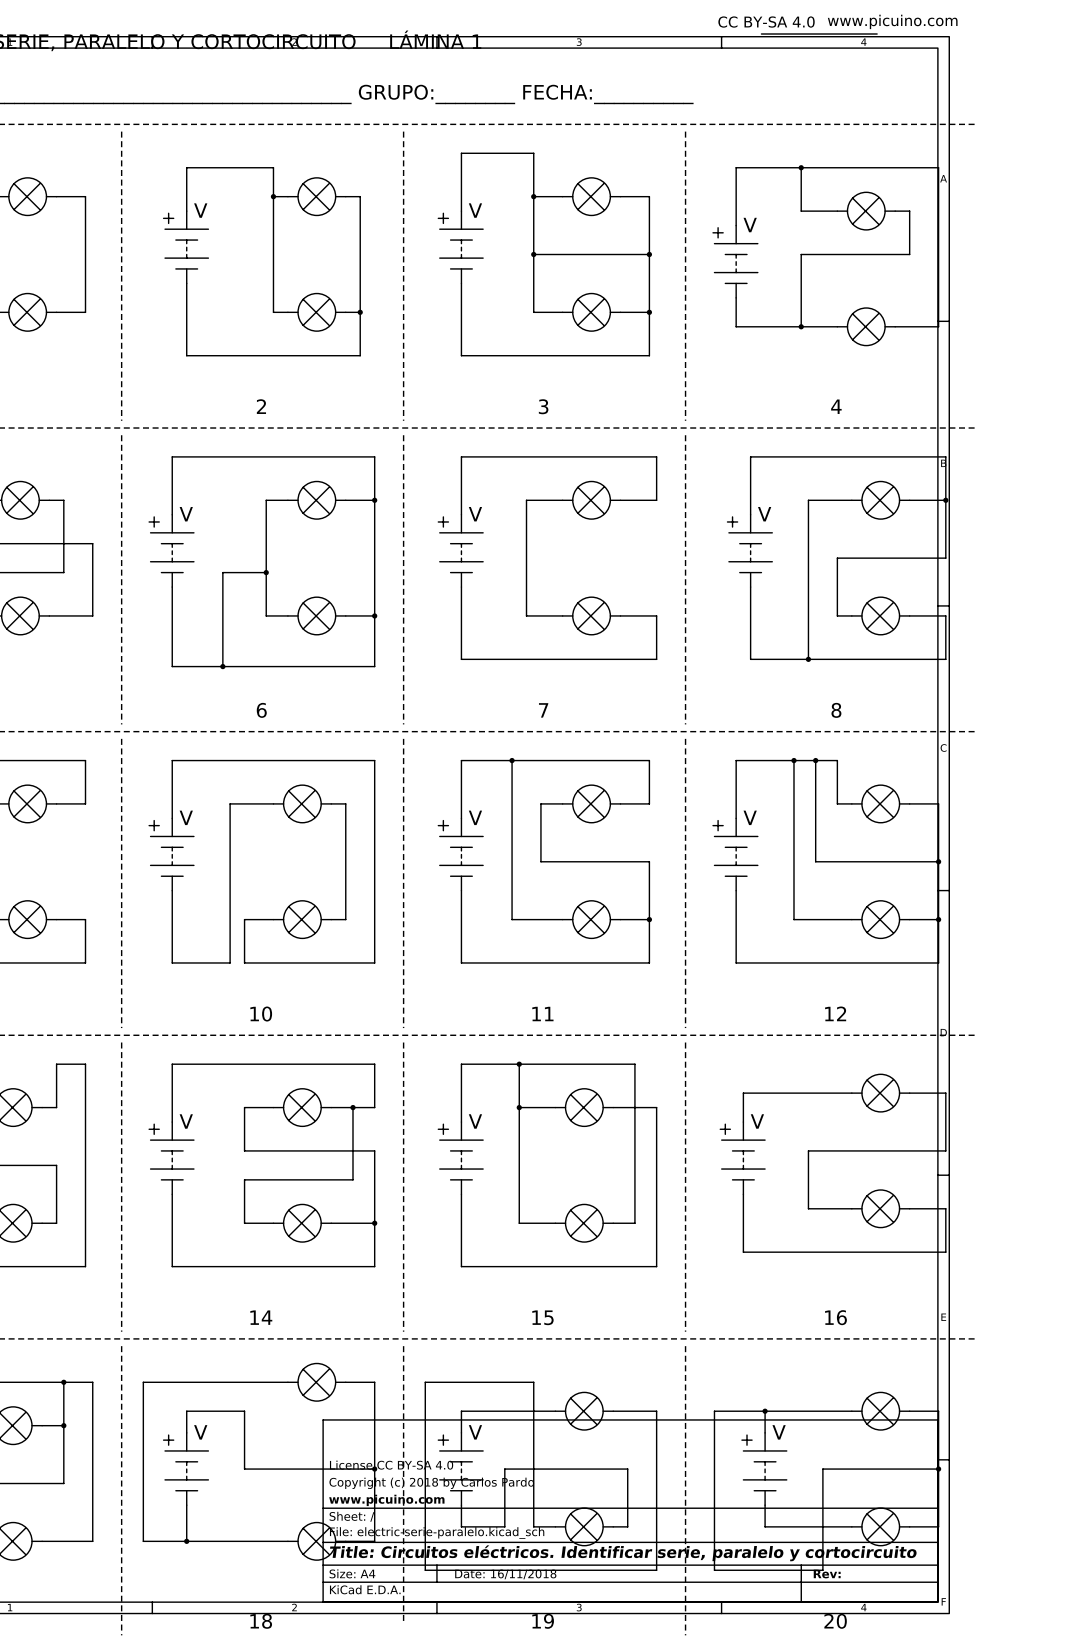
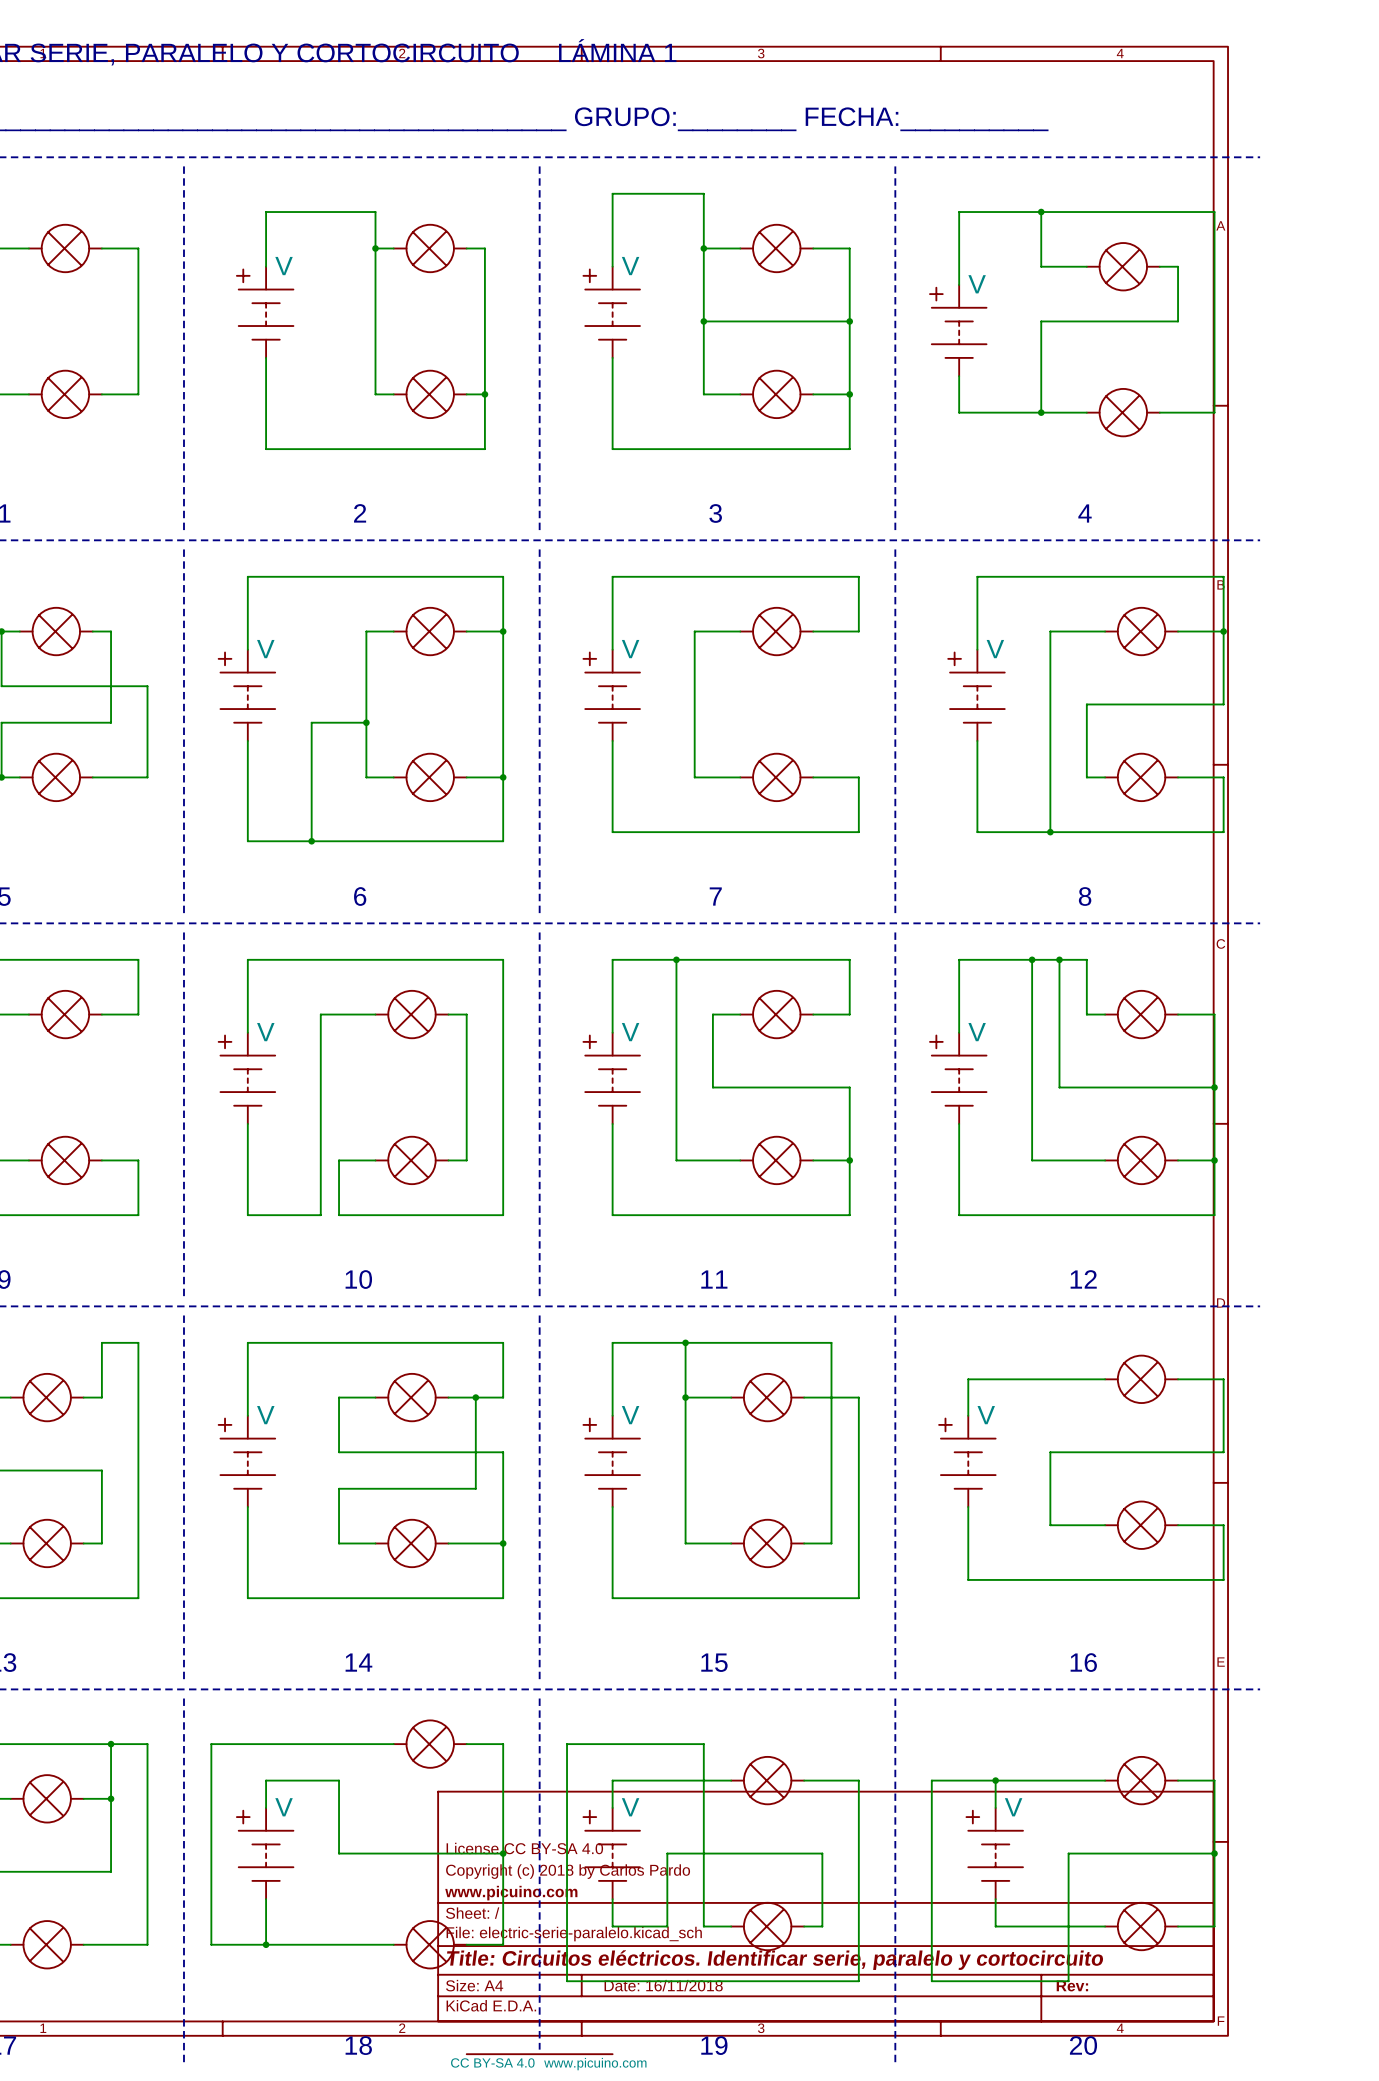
part: (819, 34) -> none
part: none -> (539, 2054)

